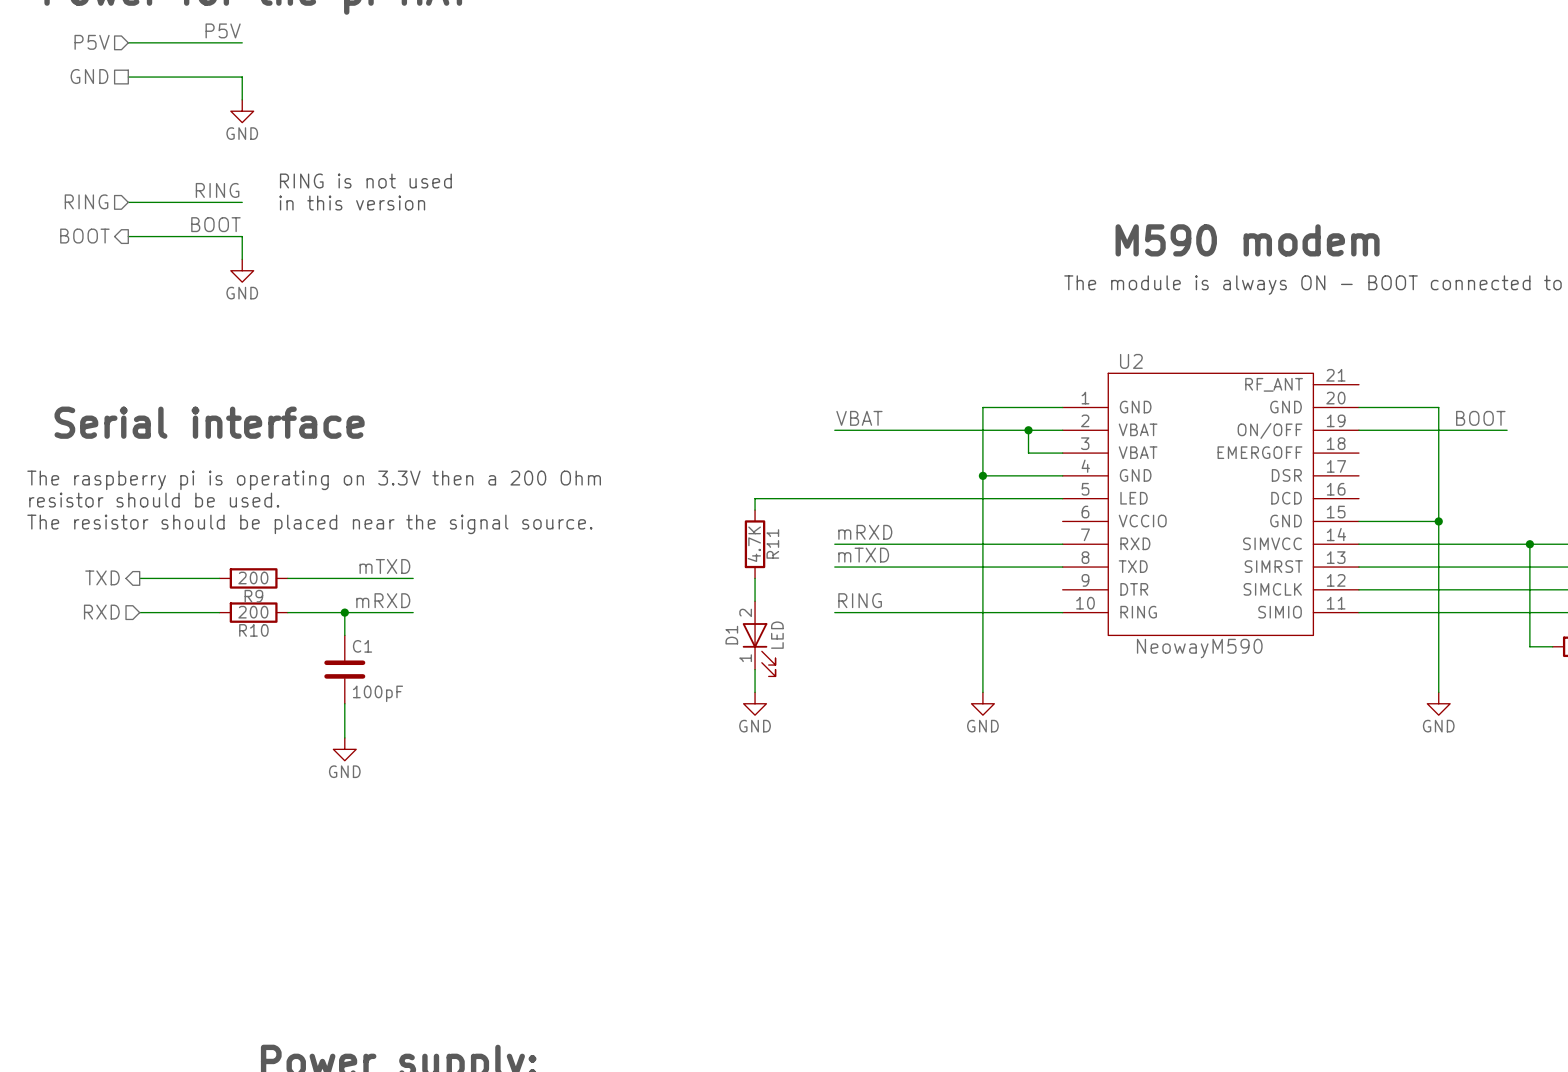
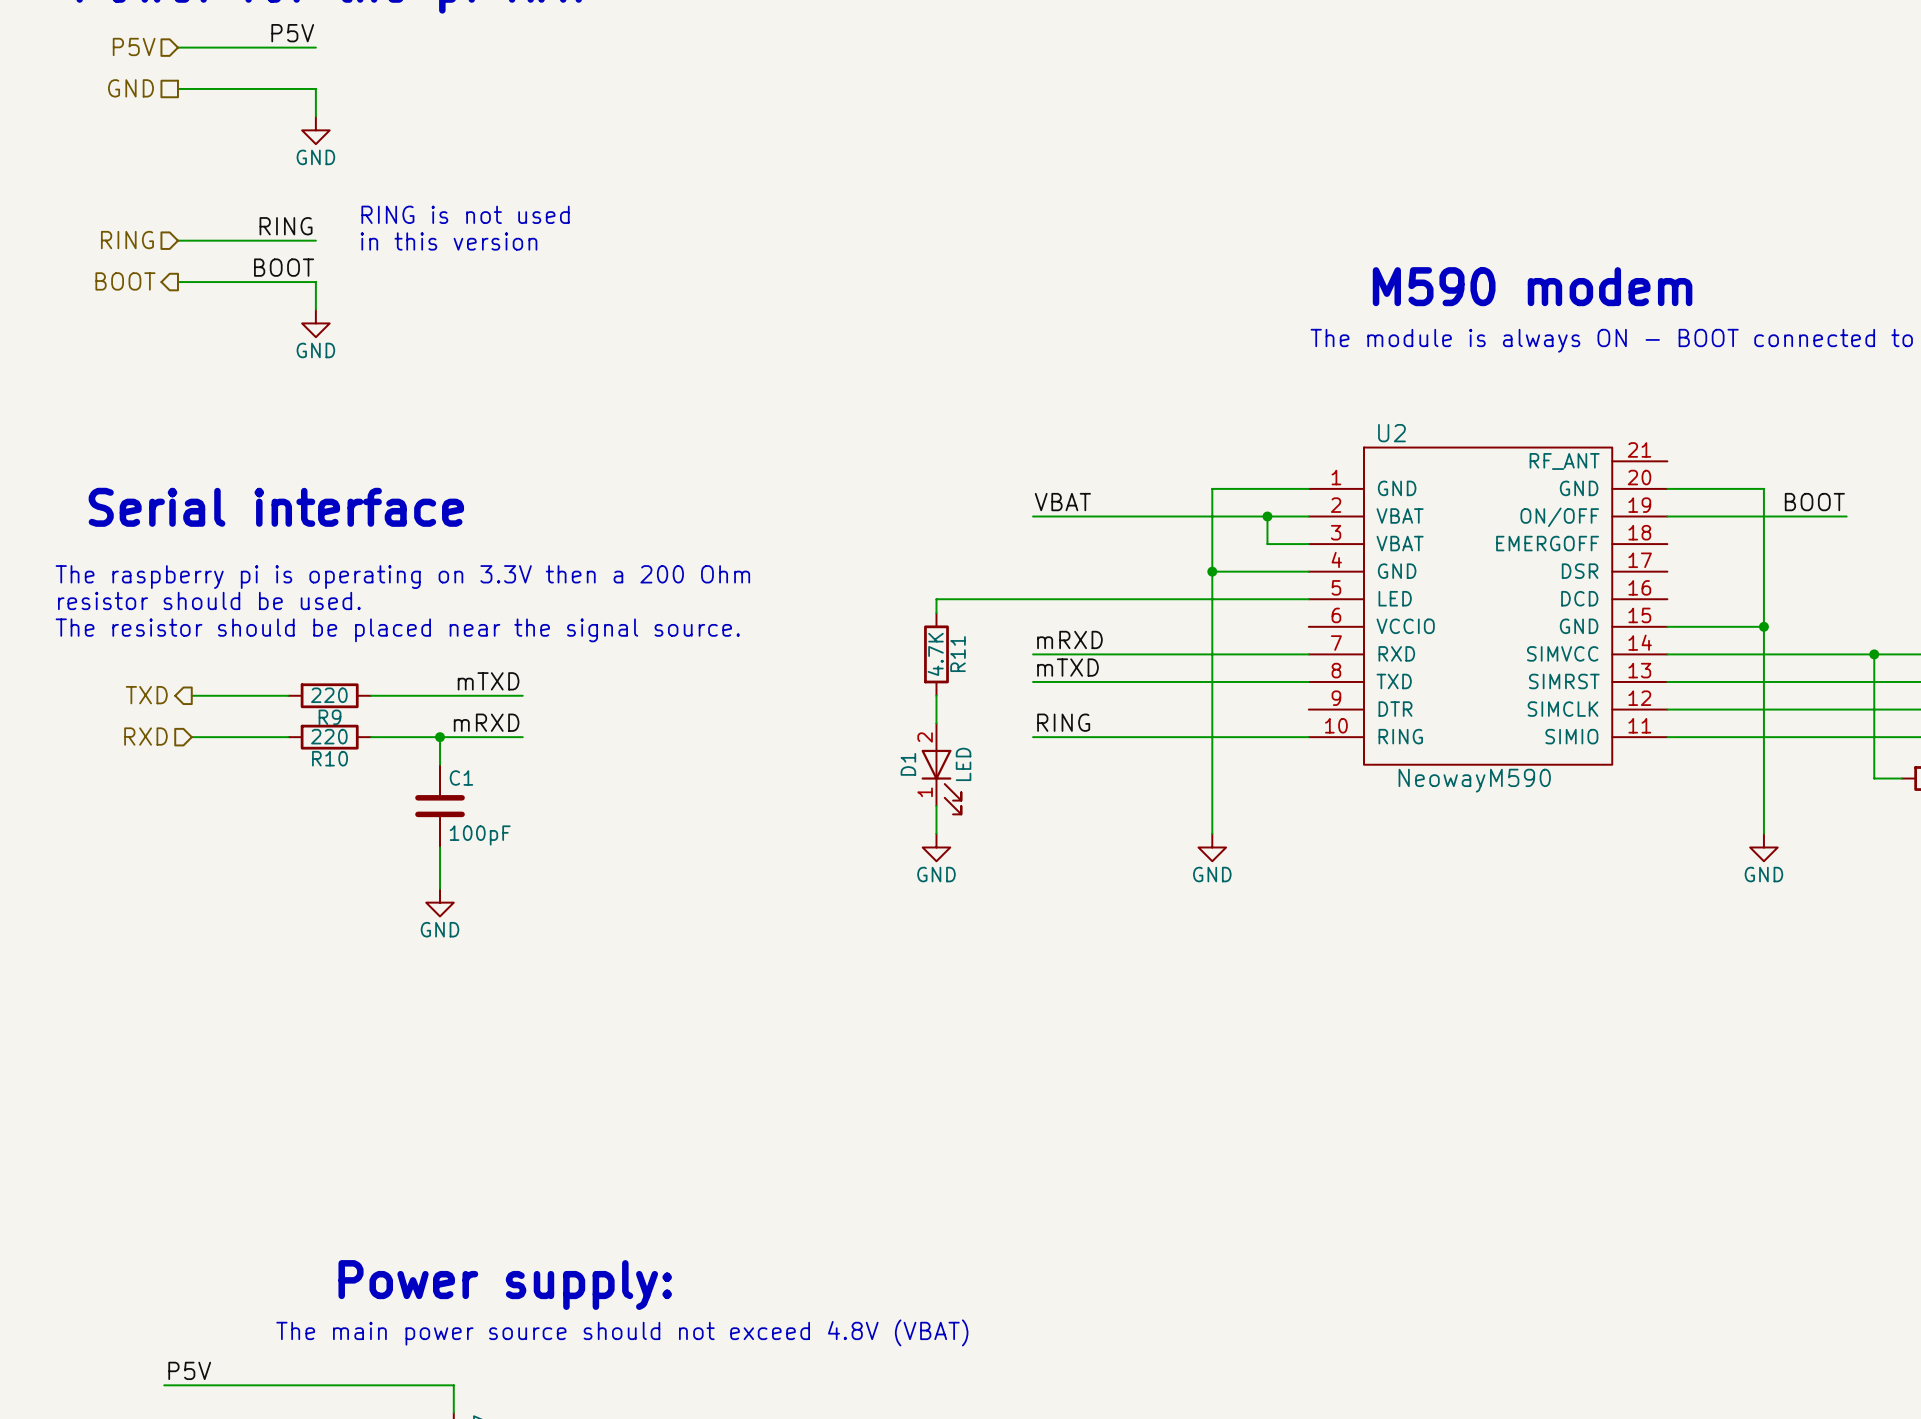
R9 value: 200 (253, 577) -> 220 (329, 695)
R10 value: 200 (253, 612) -> 220 (329, 736)

